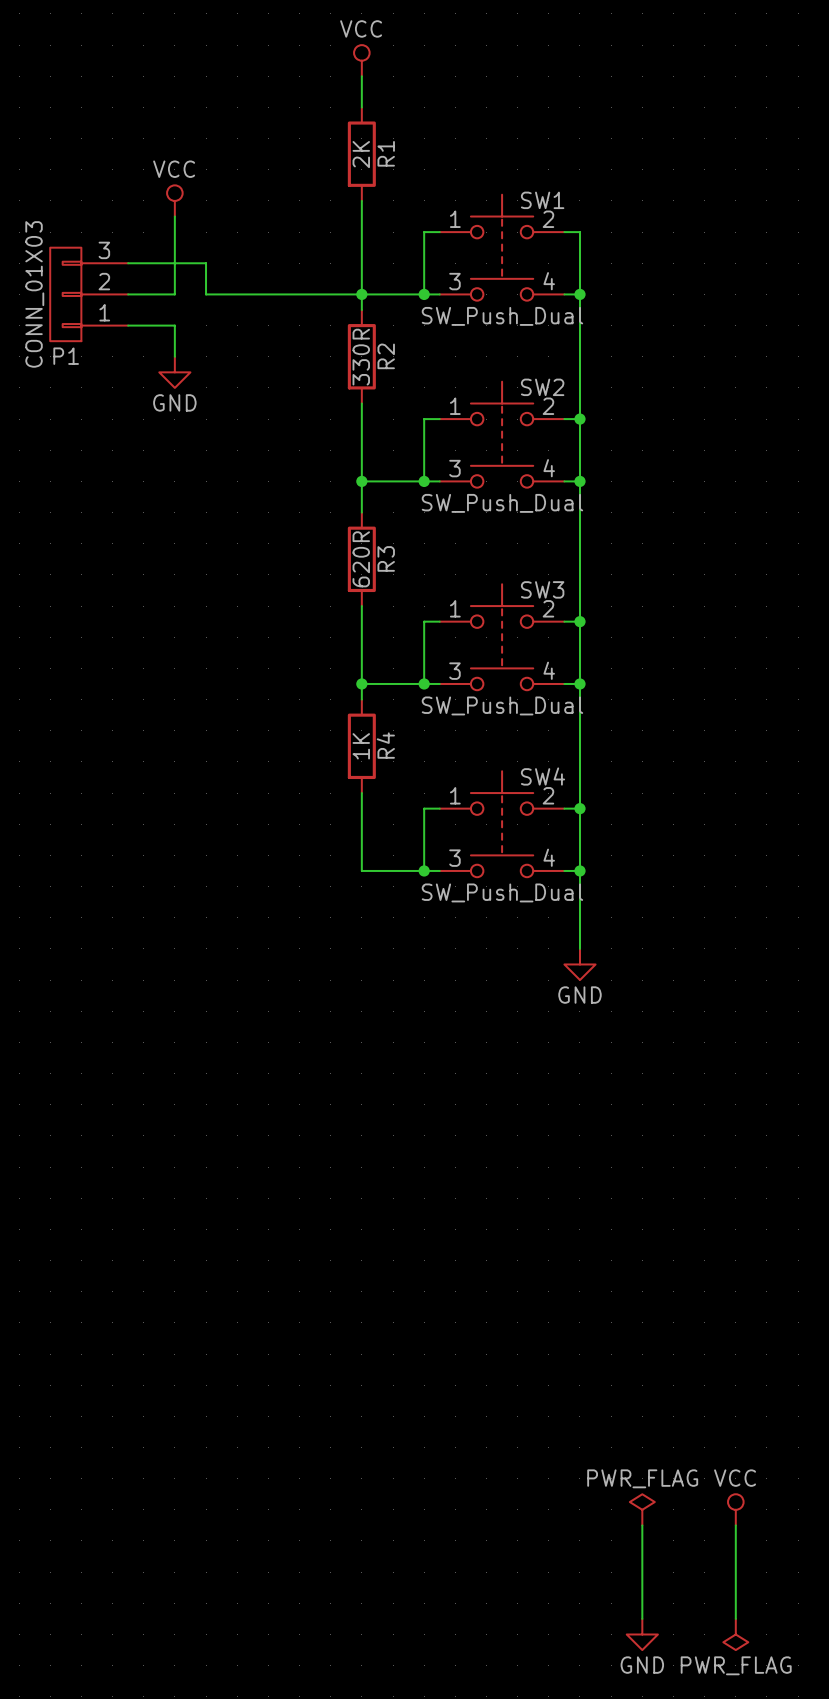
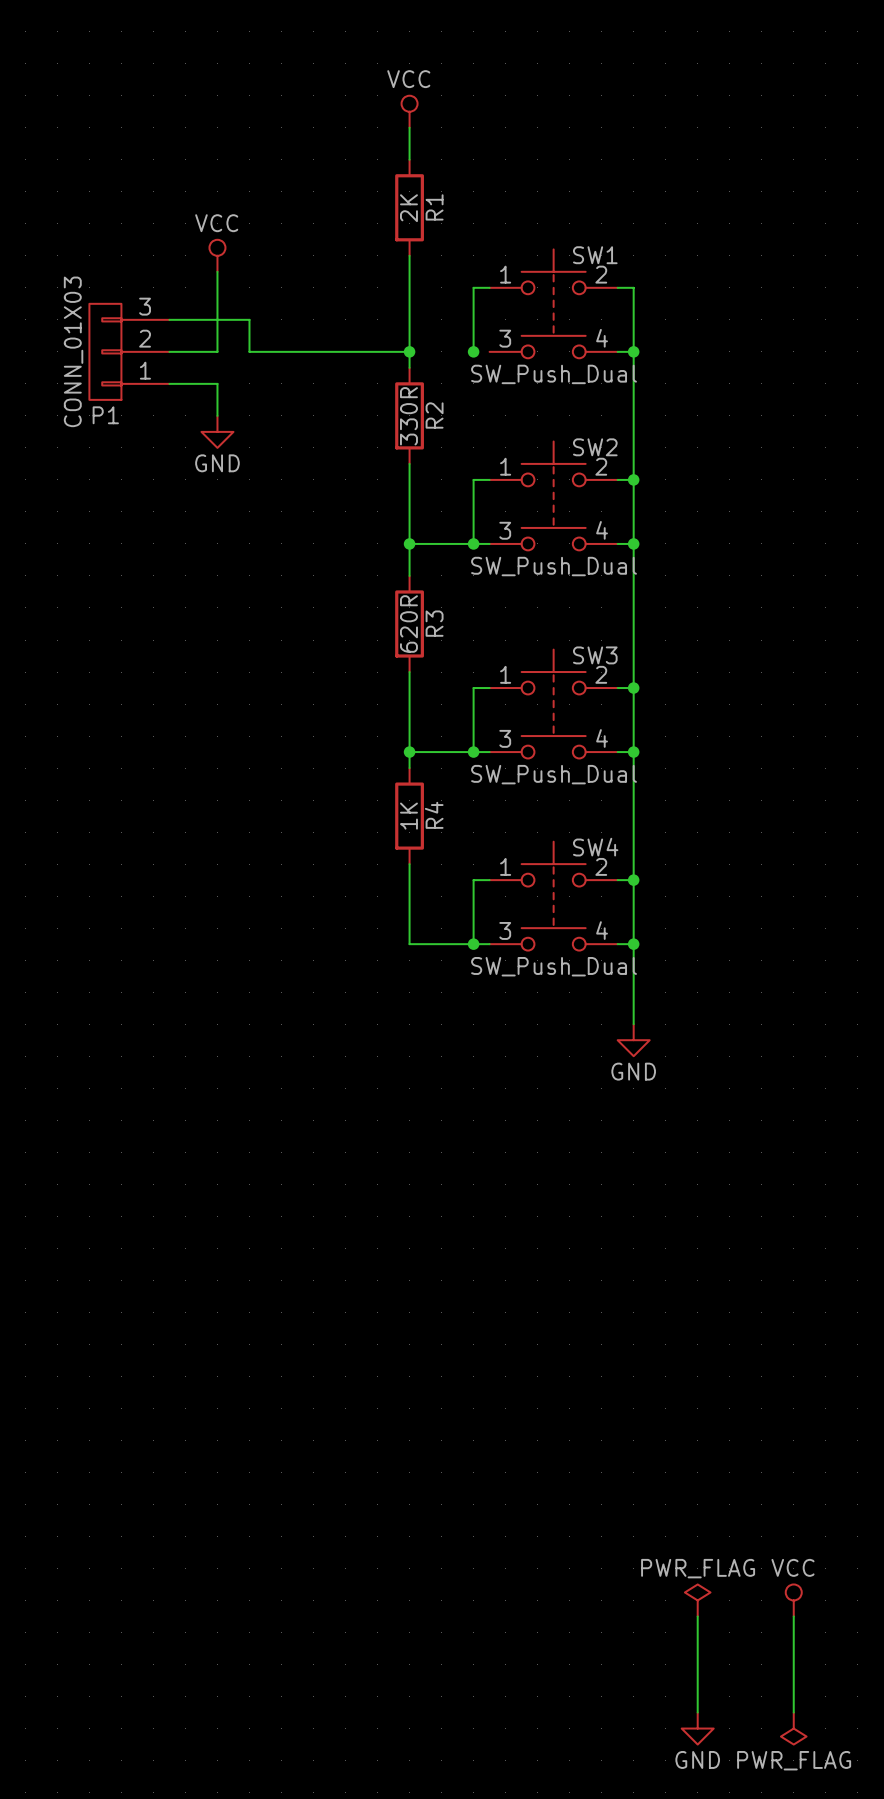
wire: (361, 294) (439, 294) -> none

